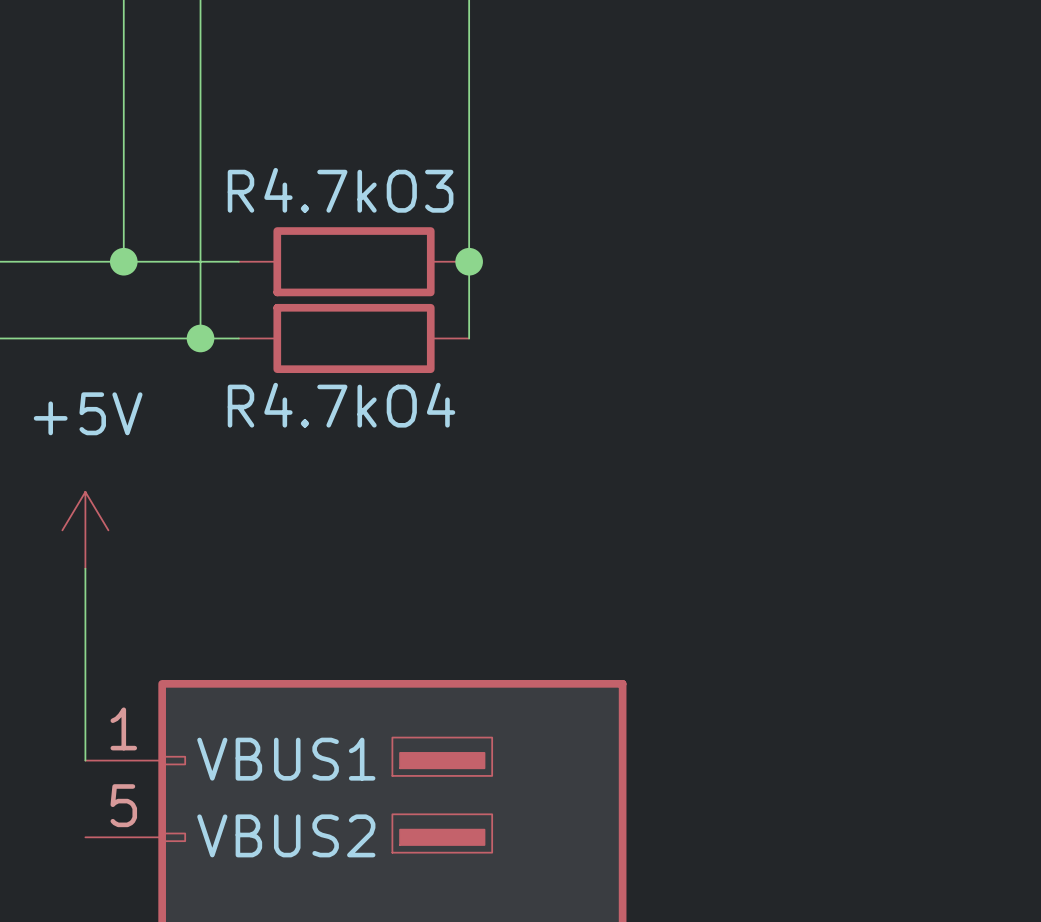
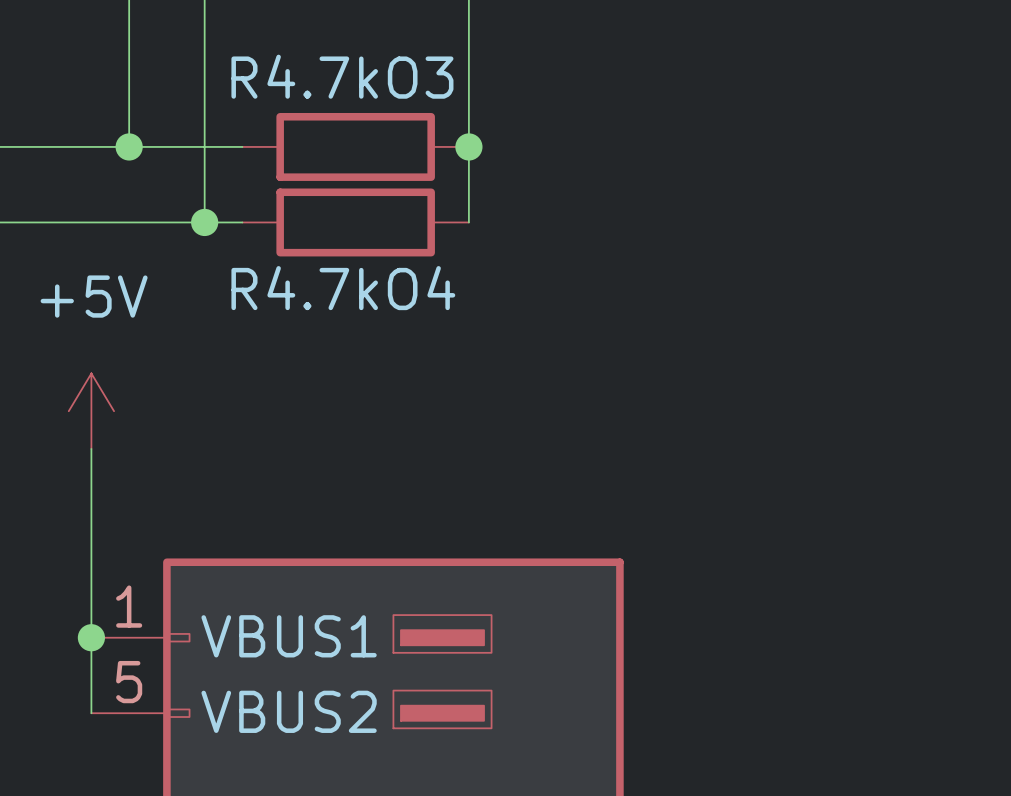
wire: none -> (91, 637) (91, 713)
junction: none -> (91, 637)

